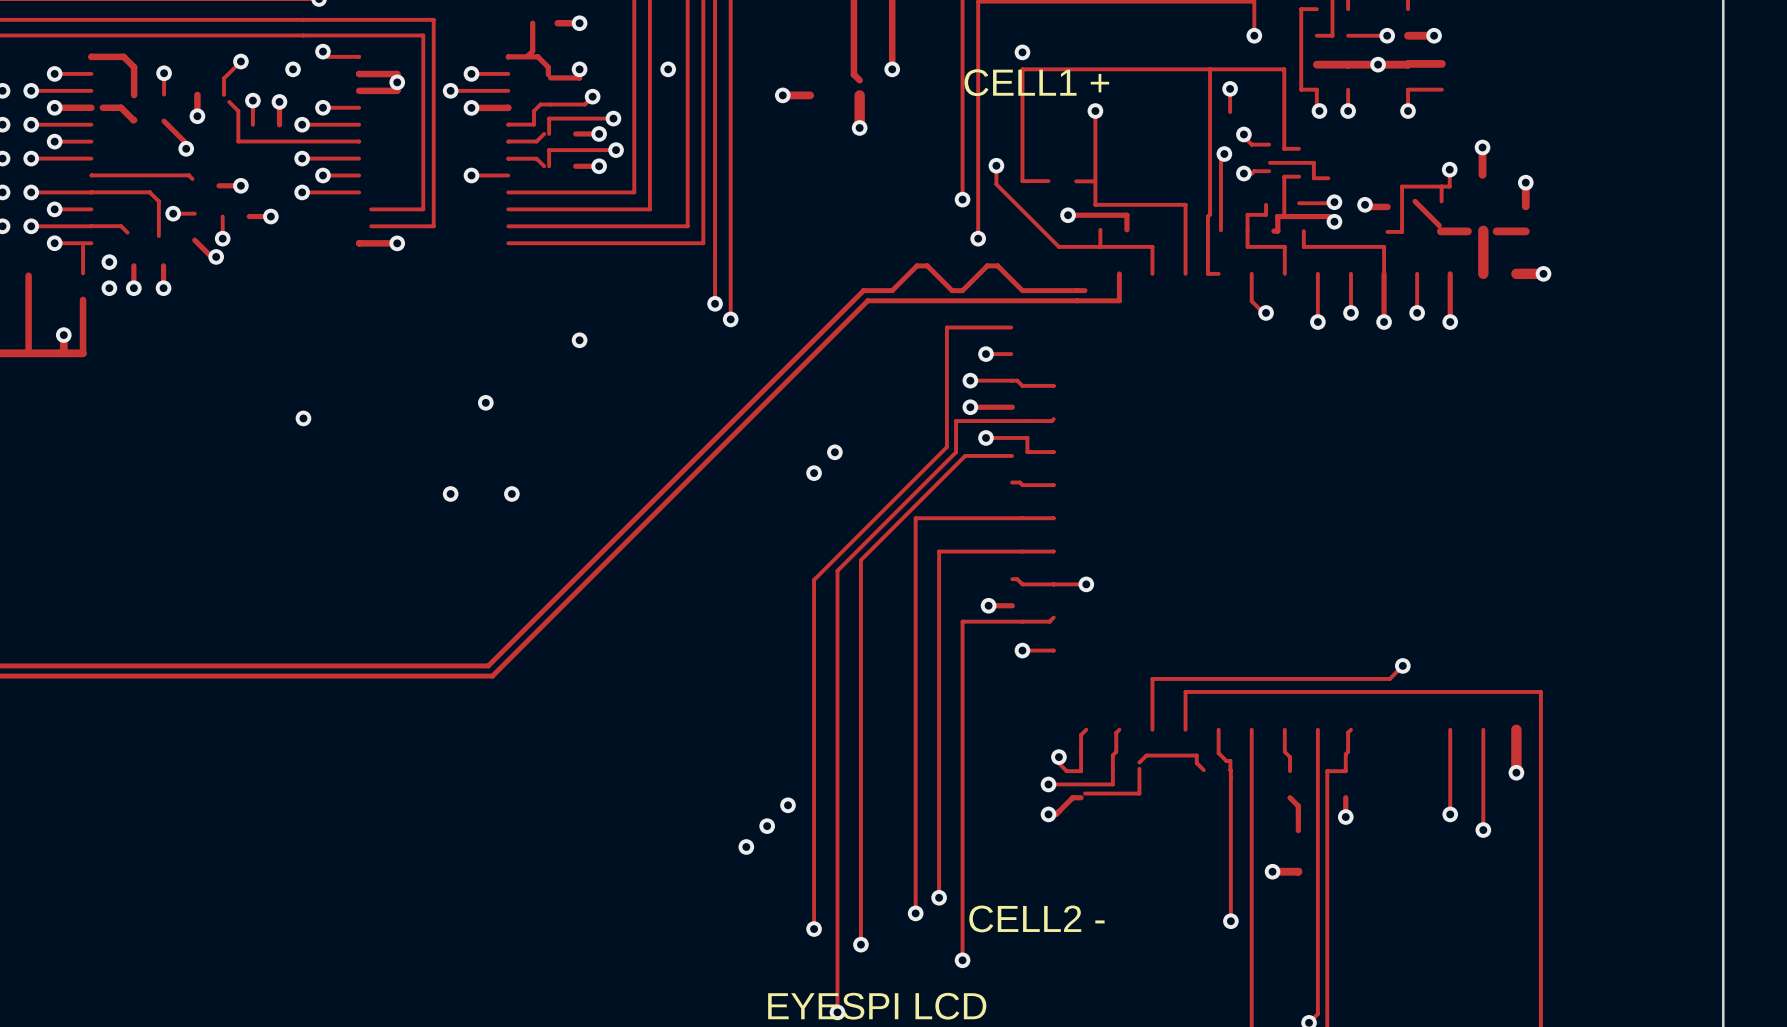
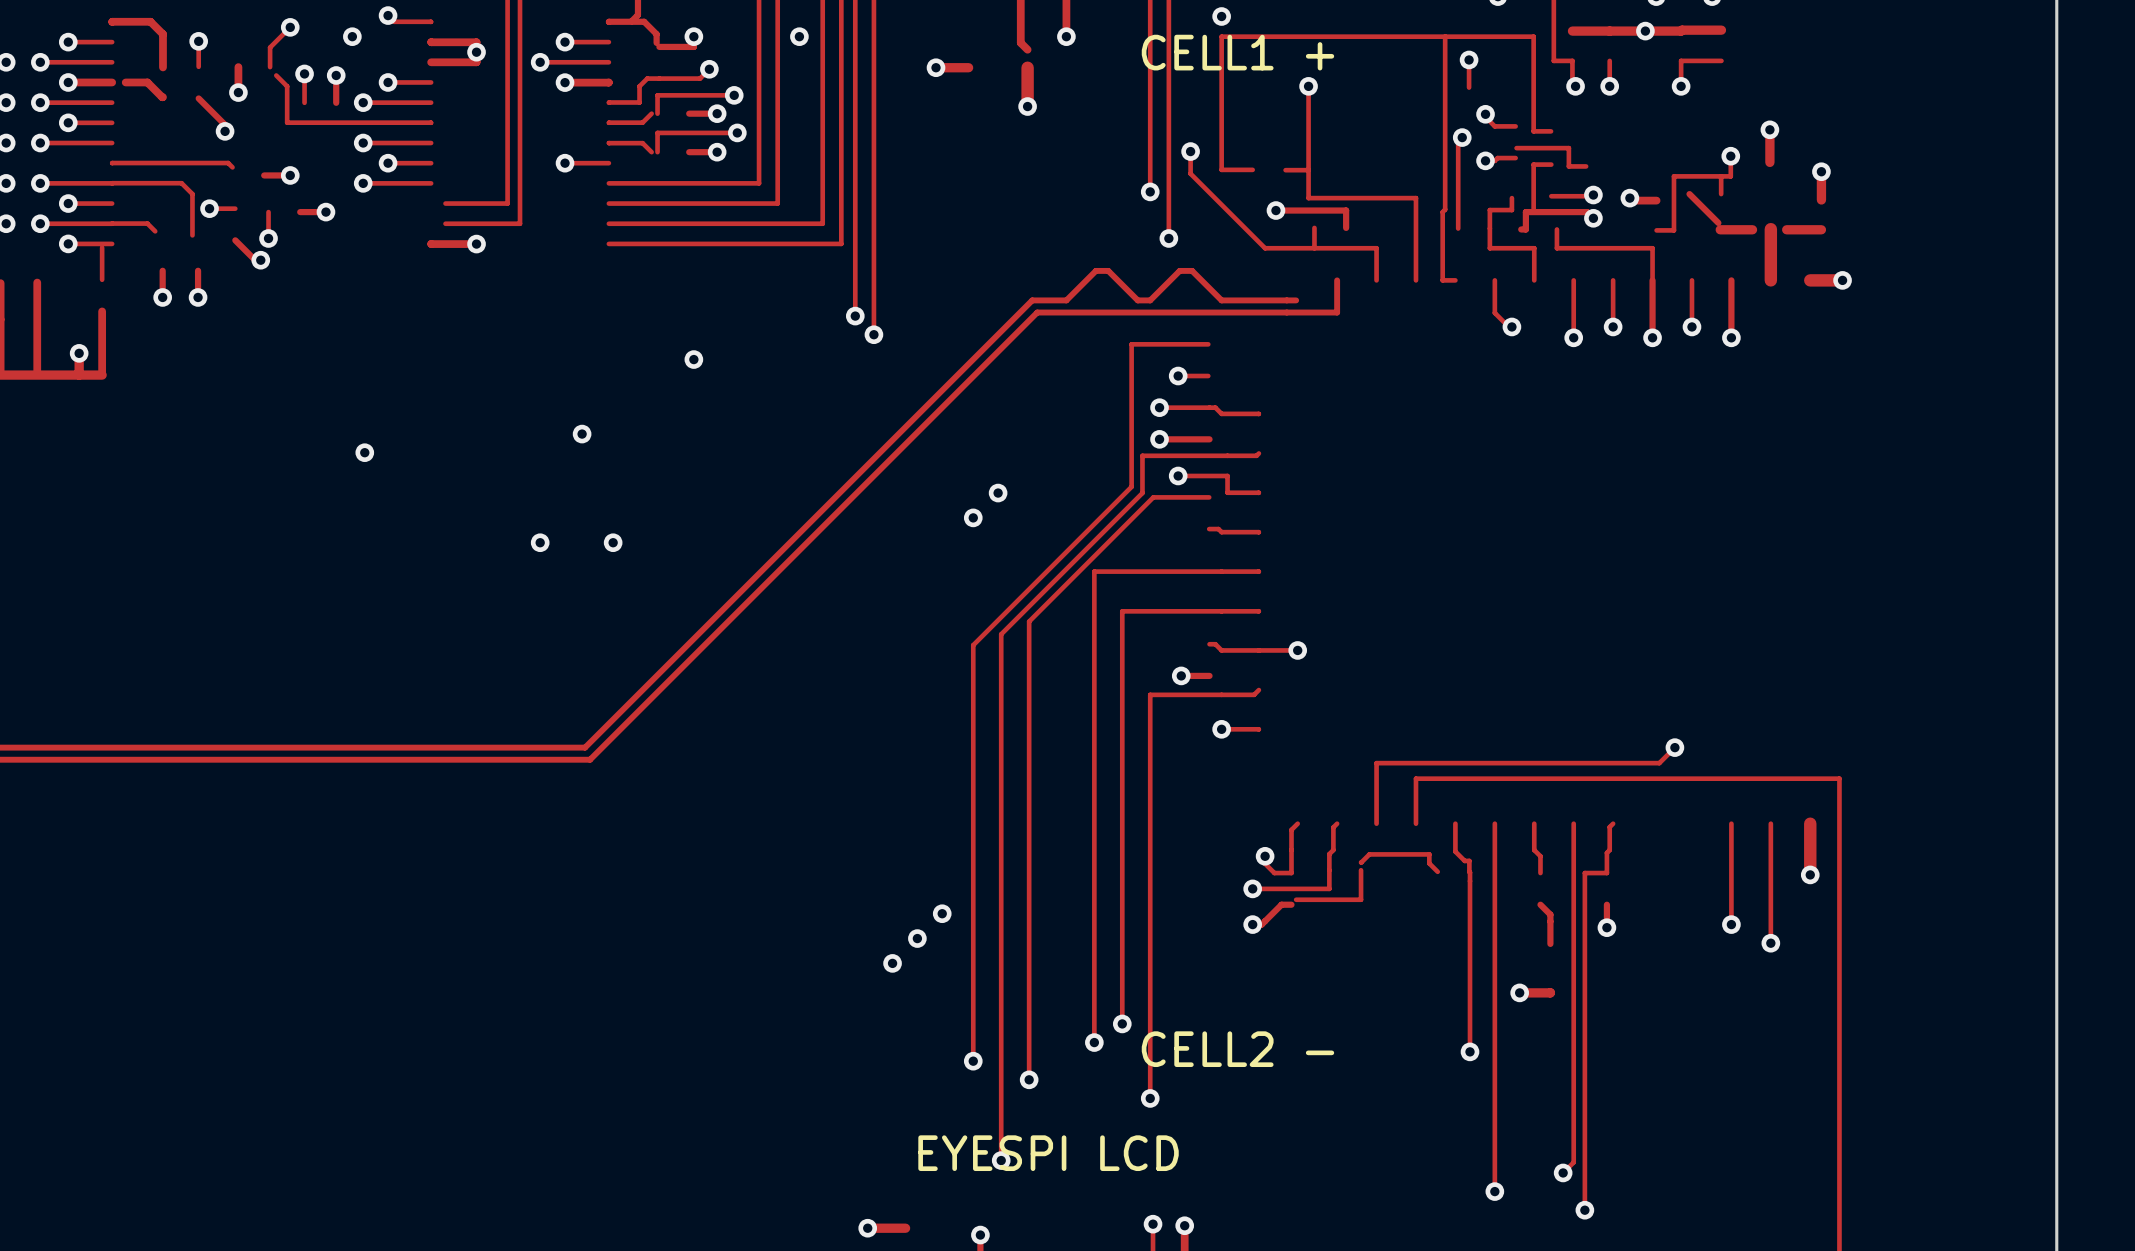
via: (109, 262) -> none
via: (109, 288) -> none

